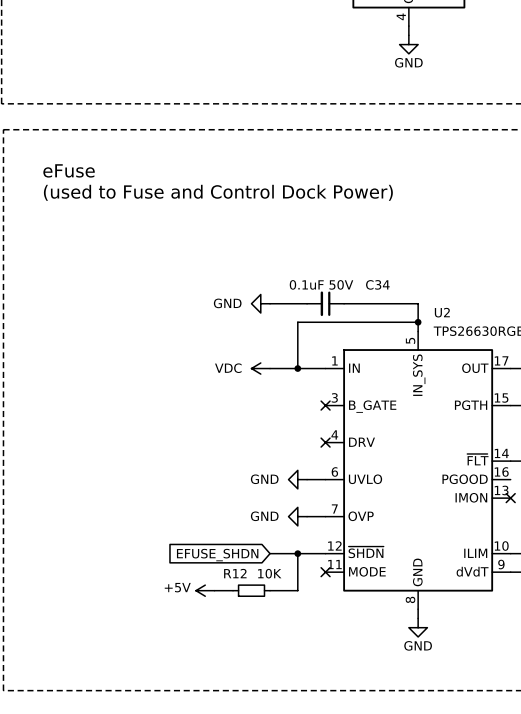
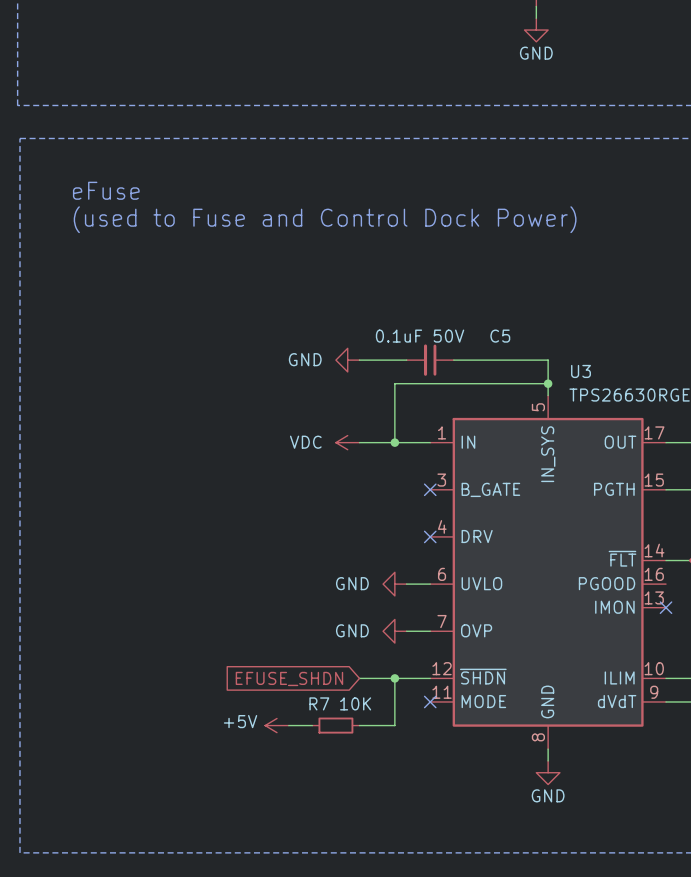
C34 name: C34 (377, 284) -> C5 (500, 336)
U2 name: U2 (442, 312) -> U3 (581, 371)
R12 name: R12 (235, 573) -> R7 (319, 703)

